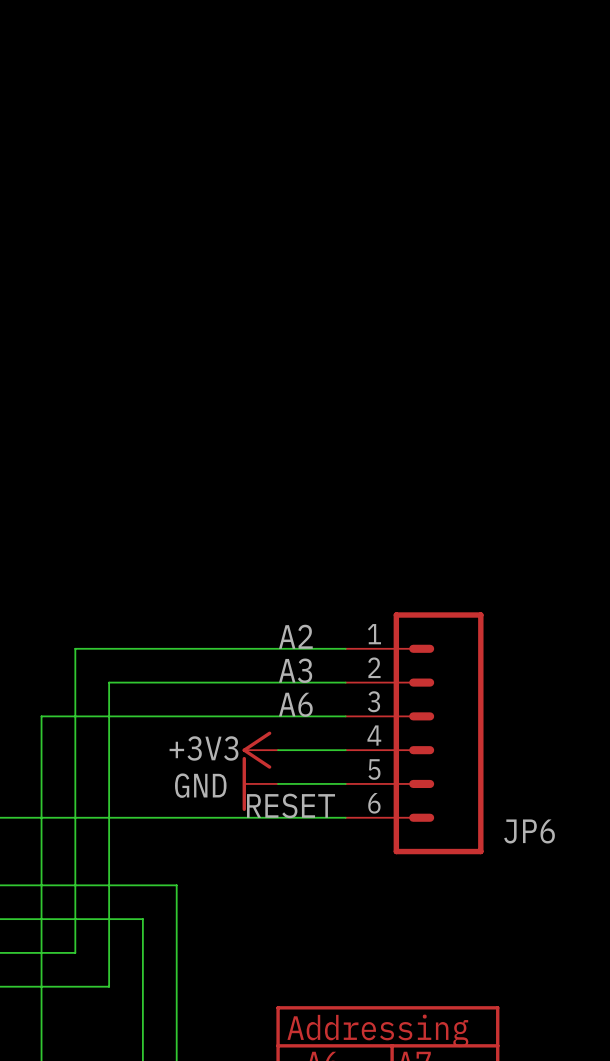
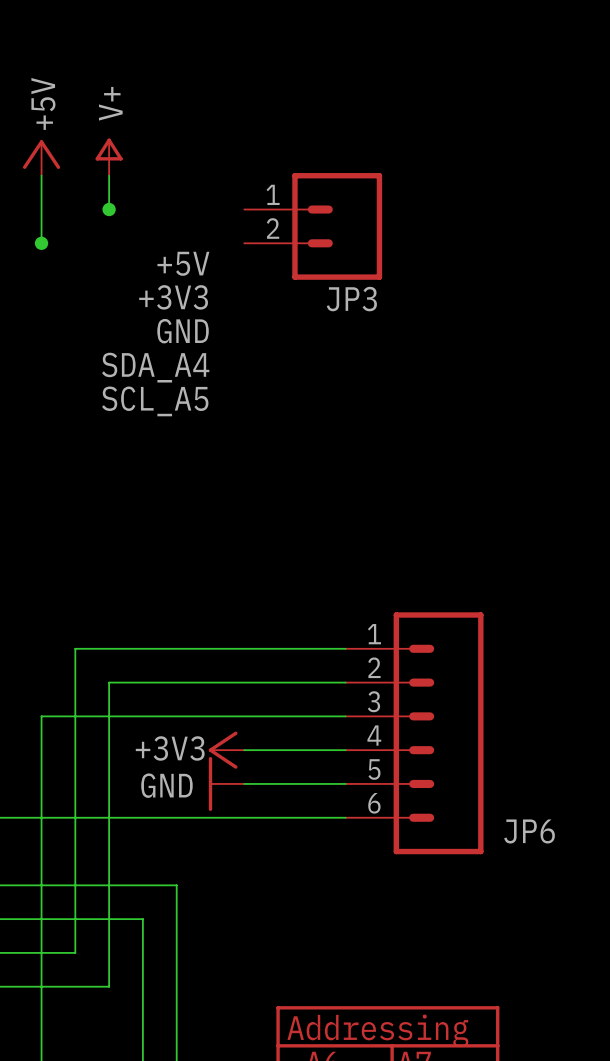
power symbol: none -> +5V (41, 157)
power symbol: none -> V+ (109, 157)
wire: none -> (41, 175) (41, 243)
wire: none -> (109, 175) (109, 209)
junction: none -> (109, 209)
JP3: none -> (313, 226)
junction: none -> (41, 243)
label: none -> +5V (183, 263)
label: none -> +3V3 (173, 297)
label: none -> GND (183, 331)
label: none -> SDA_A4 (155, 367)
label: none -> SCL_A5 (155, 401)
label: A2 (295, 636) -> none
label: A3 (295, 670) -> none
label: A6 (295, 704) -> none
power symbol position: +3V3 (260, 750) -> +3V3 (226, 750)
power symbol position: GND (260, 783) -> GND (226, 783)
label: RESET (291, 805) -> none

